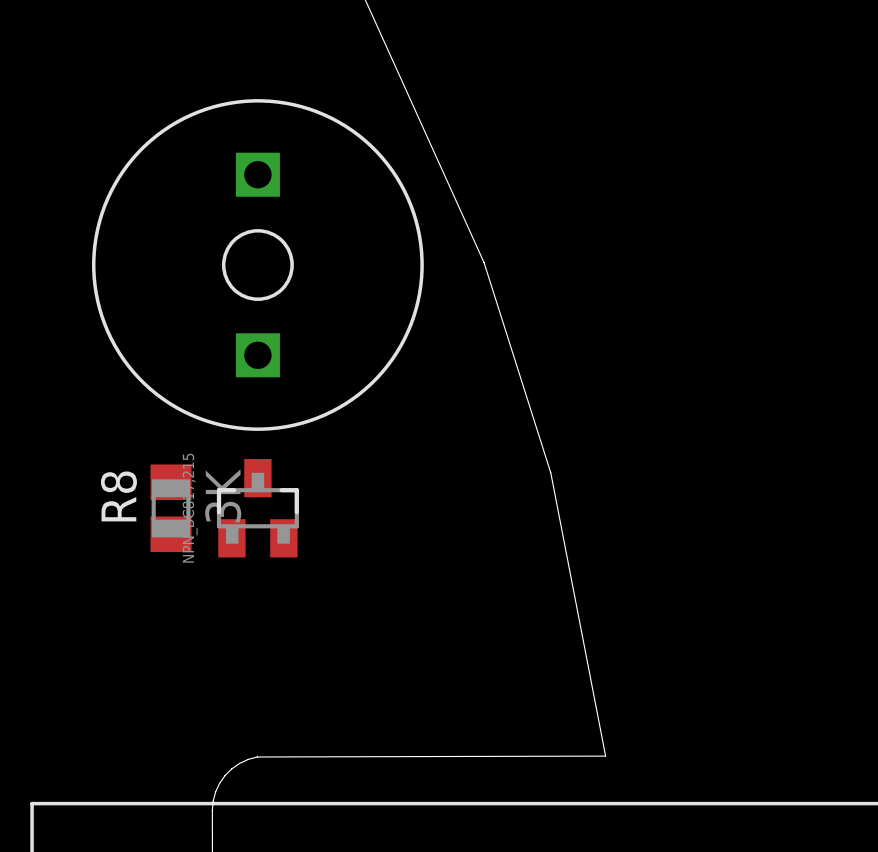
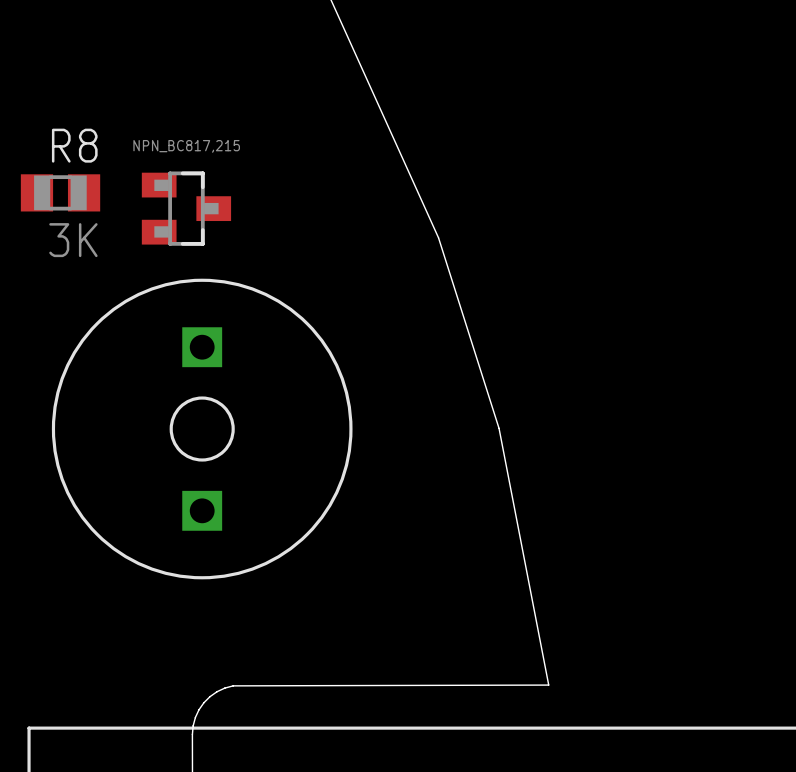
part position: (257, 265) -> (202, 429)
R8 rotation: 0° (171, 508) -> 90° clockwise (60, 192)
R8 position: (171, 508) -> (60, 192)
part rotation: 0° (257, 508) -> 90° clockwise (186, 208)
part position: (257, 508) -> (186, 208)

